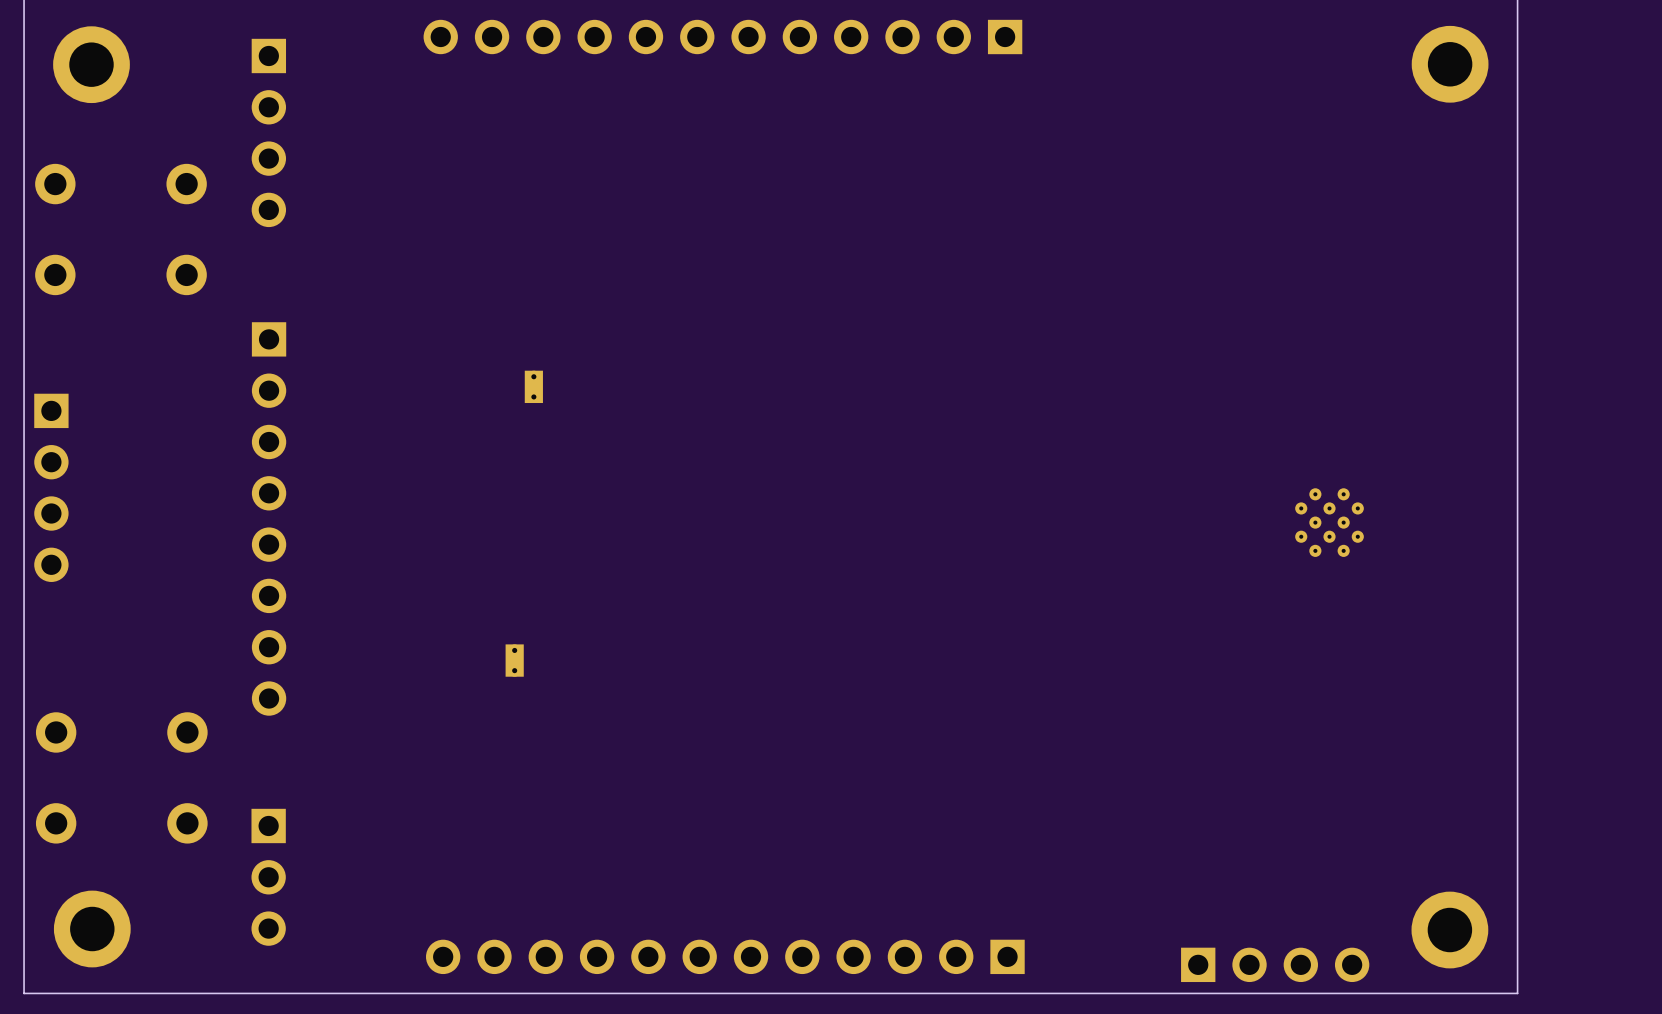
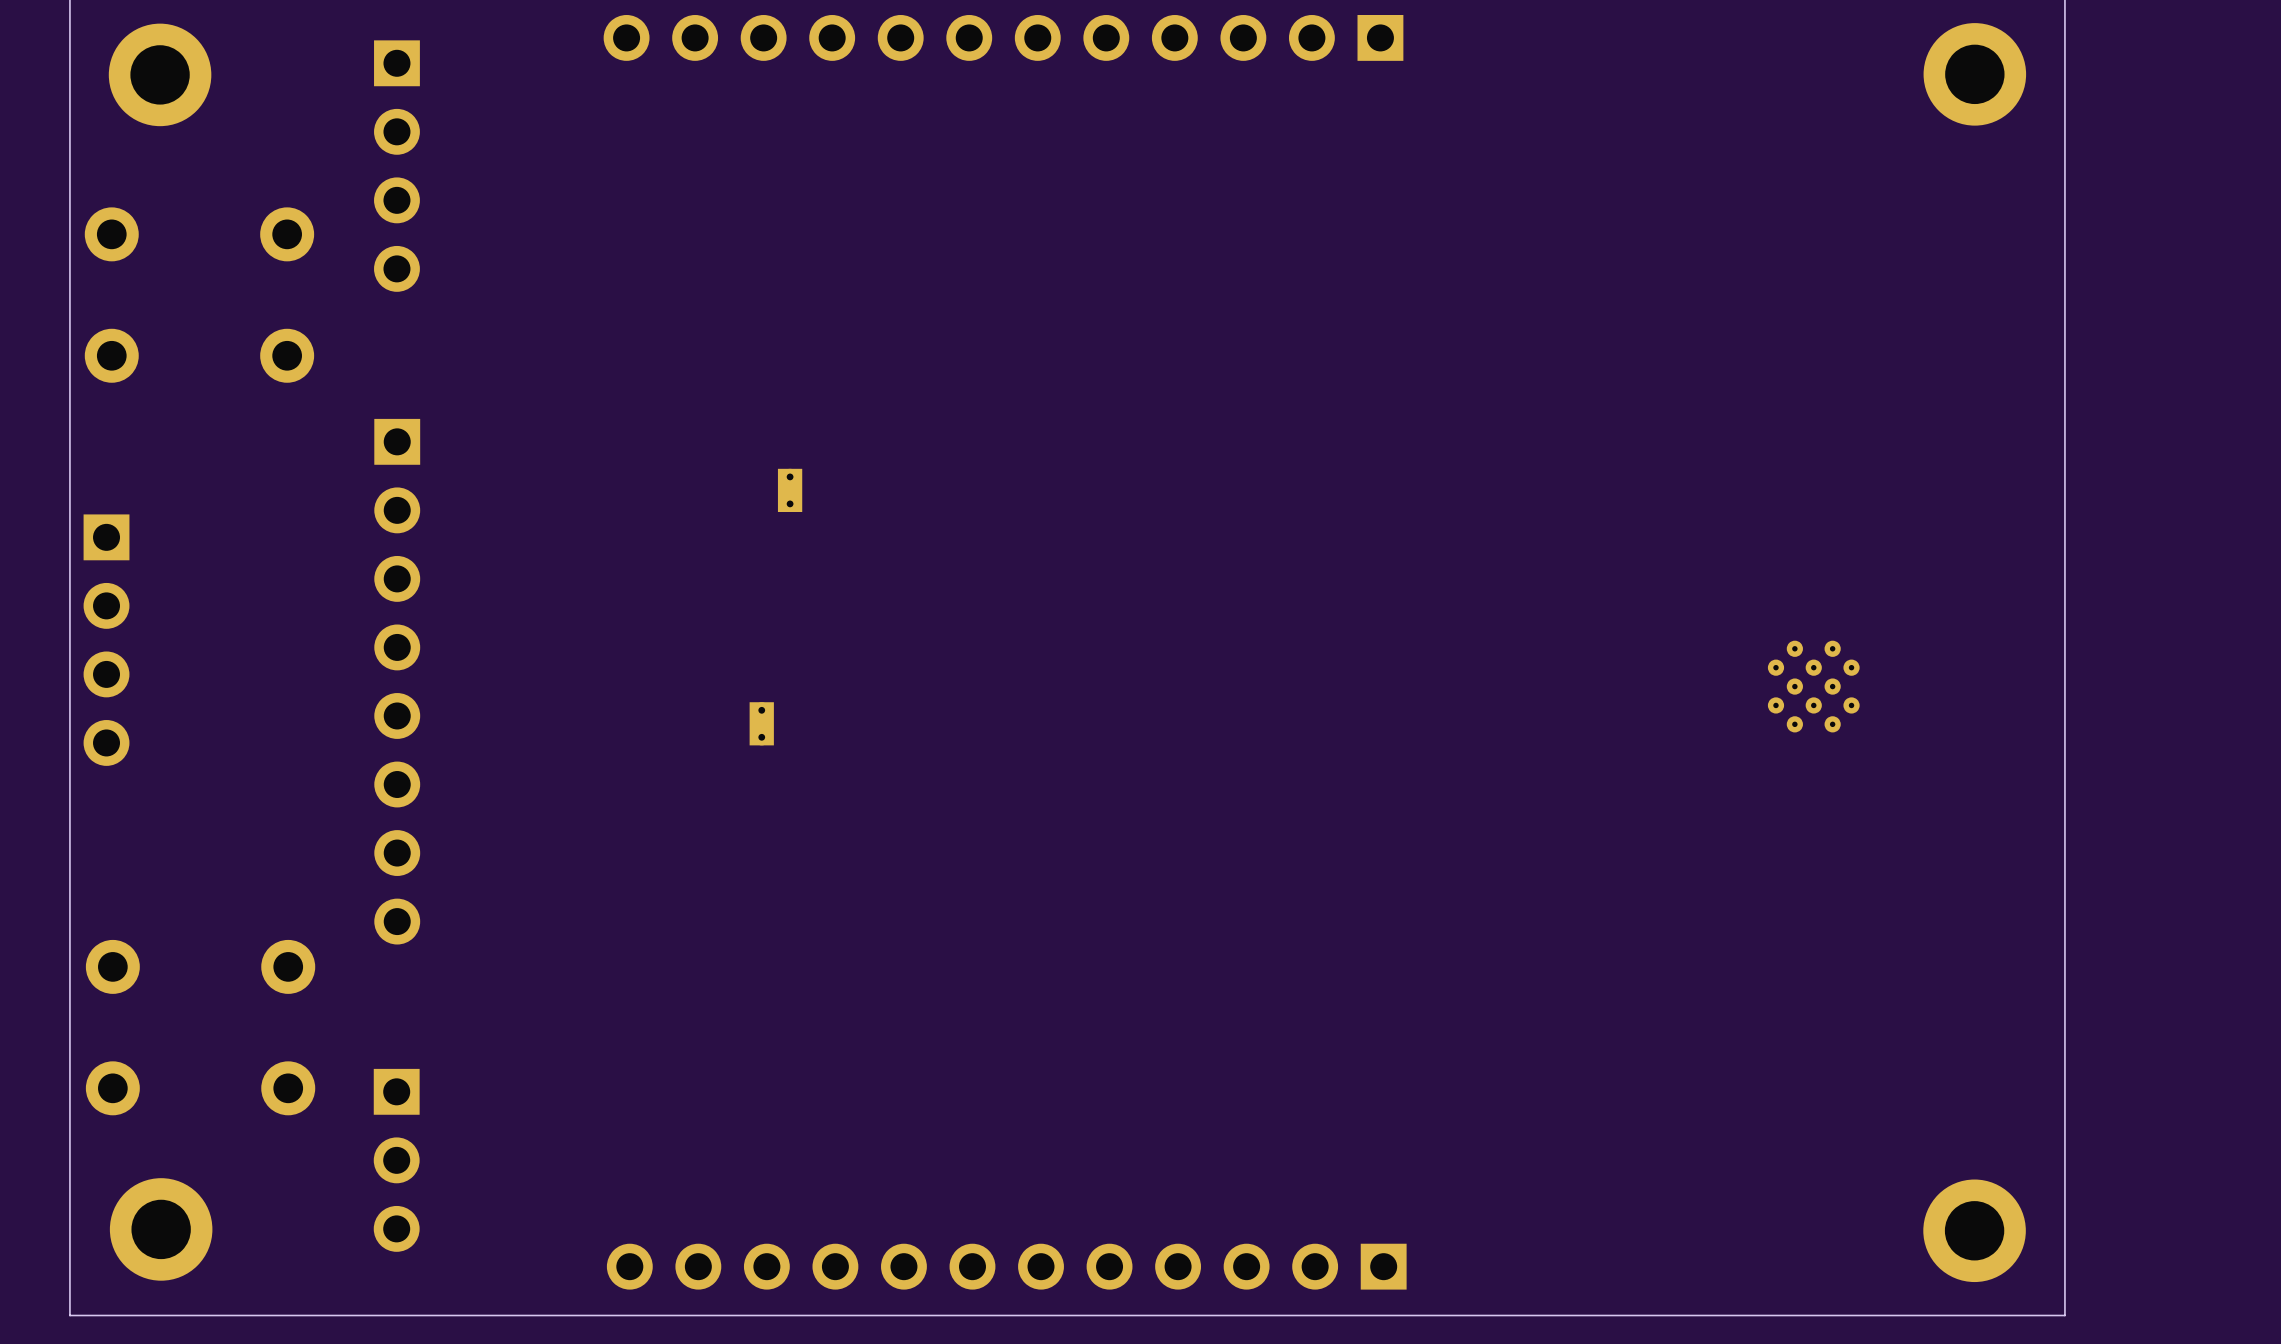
part position: (533, 386) -> (790, 490)
part: none -> (761, 723)
part: (514, 660) -> none
part: (1275, 964) -> none

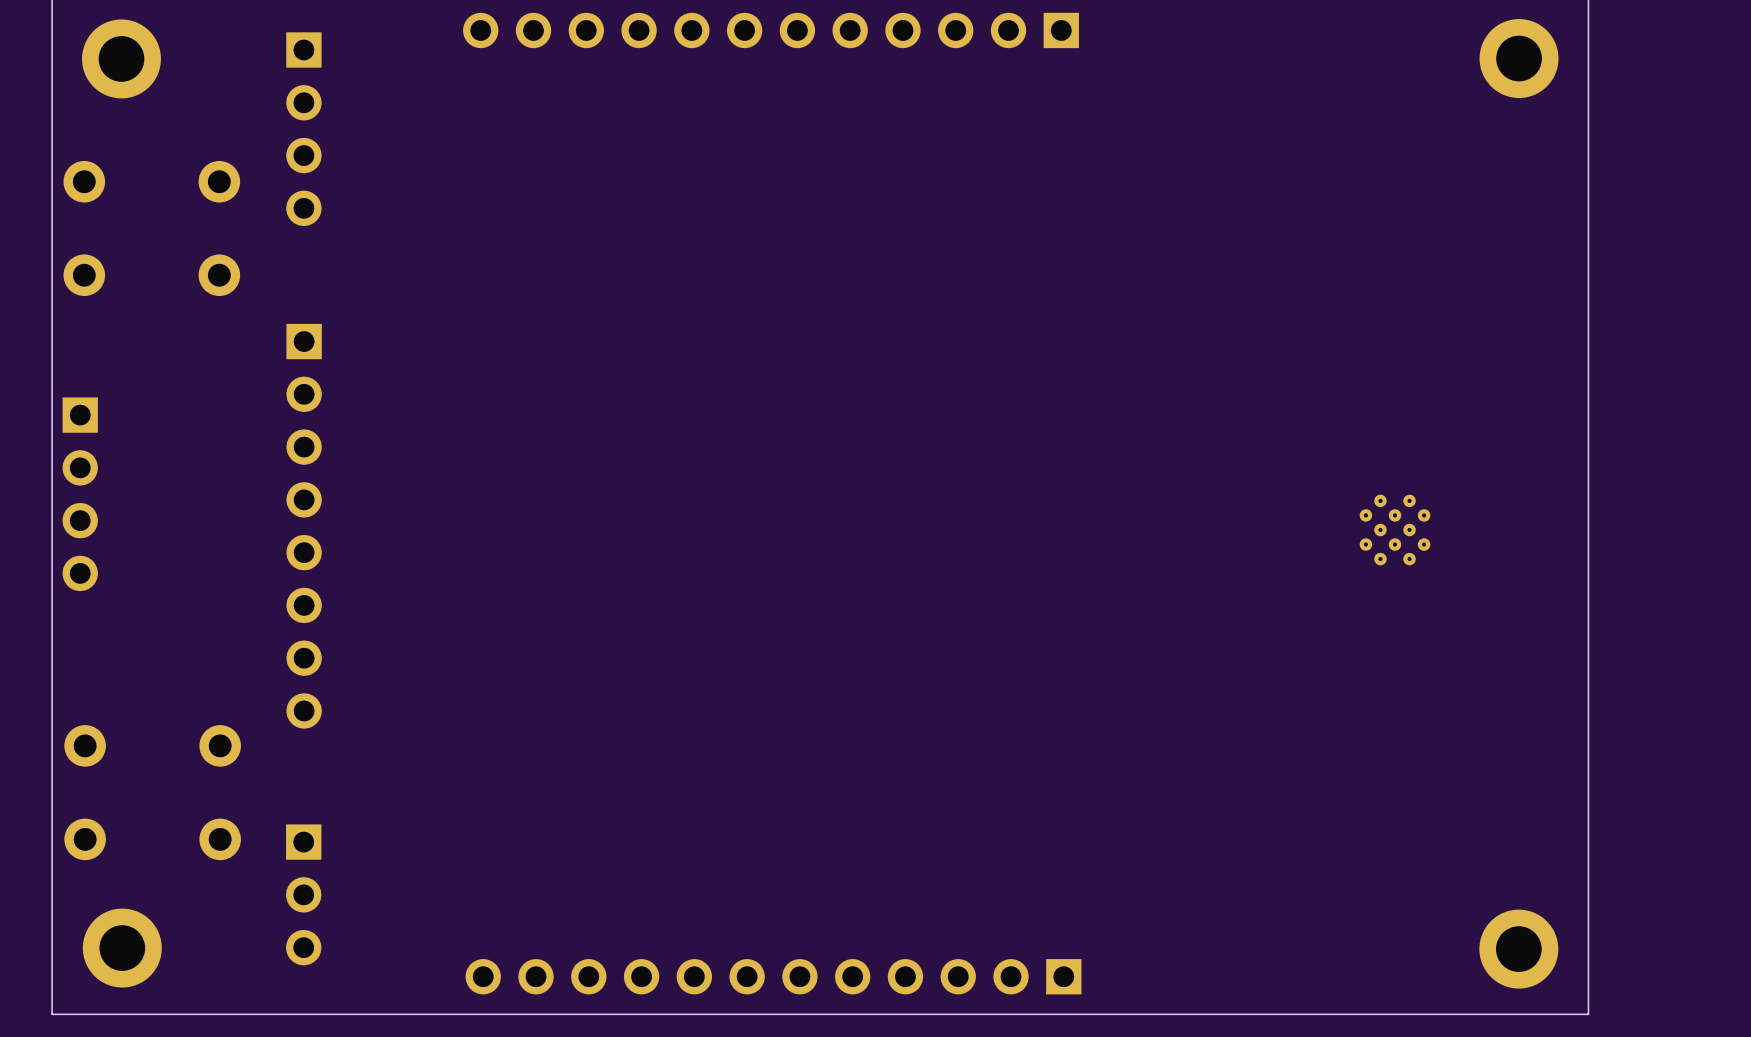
part: (790, 490) -> none
part: (761, 723) -> none

